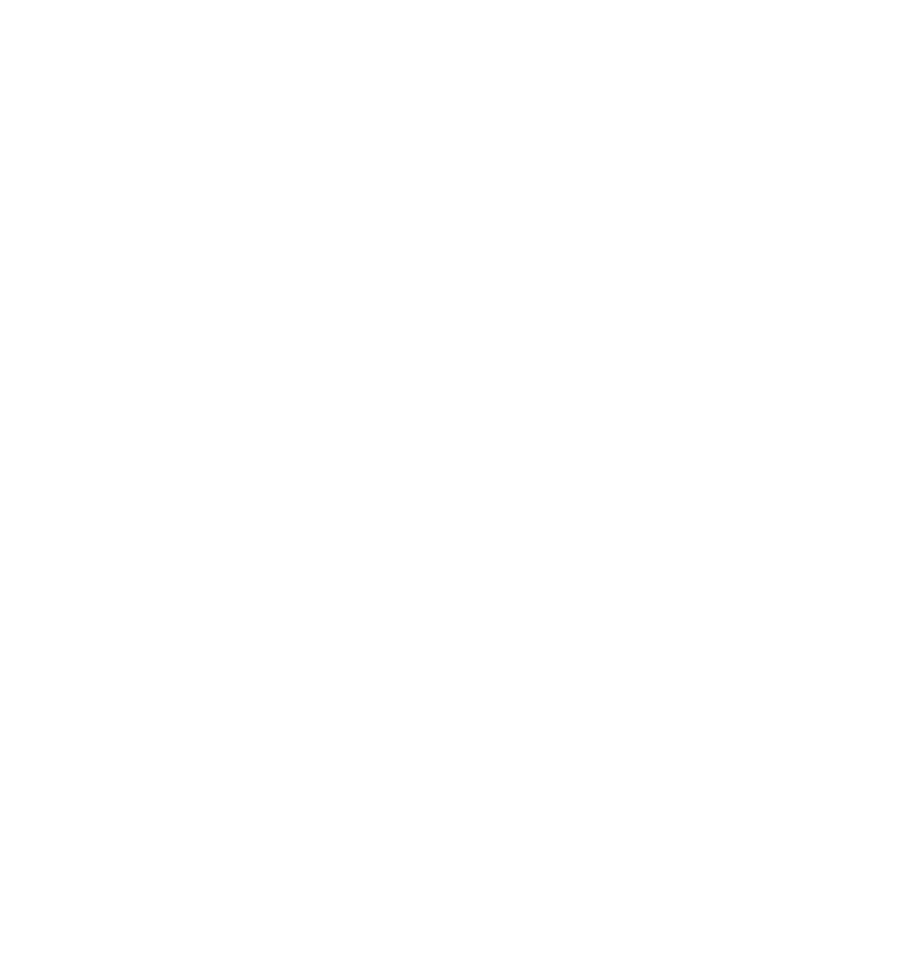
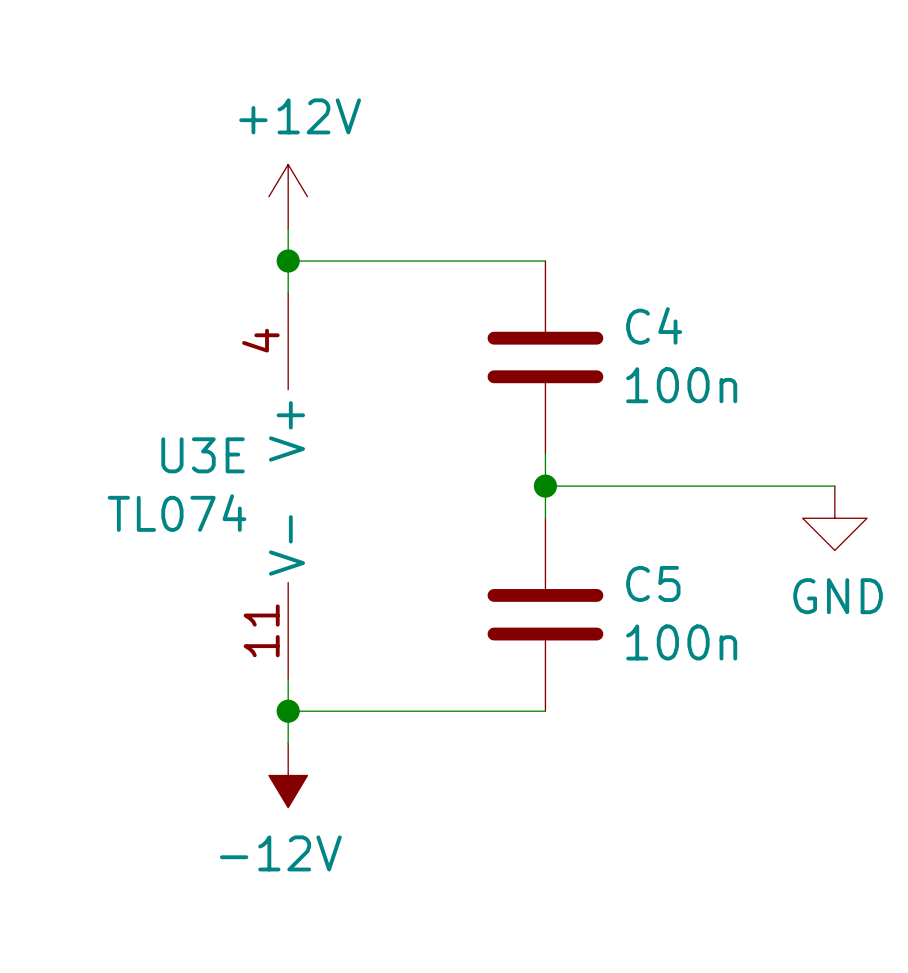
power symbol: none -> +12V (288, 196)
wire: none -> (288, 228) (288, 293)
wire: none -> (288, 261) (545, 261)
junction: none -> (288, 261)
C4: none -> 100n (545, 357)
wire: none -> (545, 453) (545, 518)
U3E: none -> TL074 (288, 486)
wire: none -> (545, 486) (834, 486)
junction: none -> (545, 486)
power symbol: none -> GND (834, 518)
C5: none -> 100n (545, 614)
wire: none -> (288, 679) (288, 743)
wire: none -> (288, 711) (545, 711)
junction: none -> (288, 711)
power symbol: none -> -12V (288, 775)

